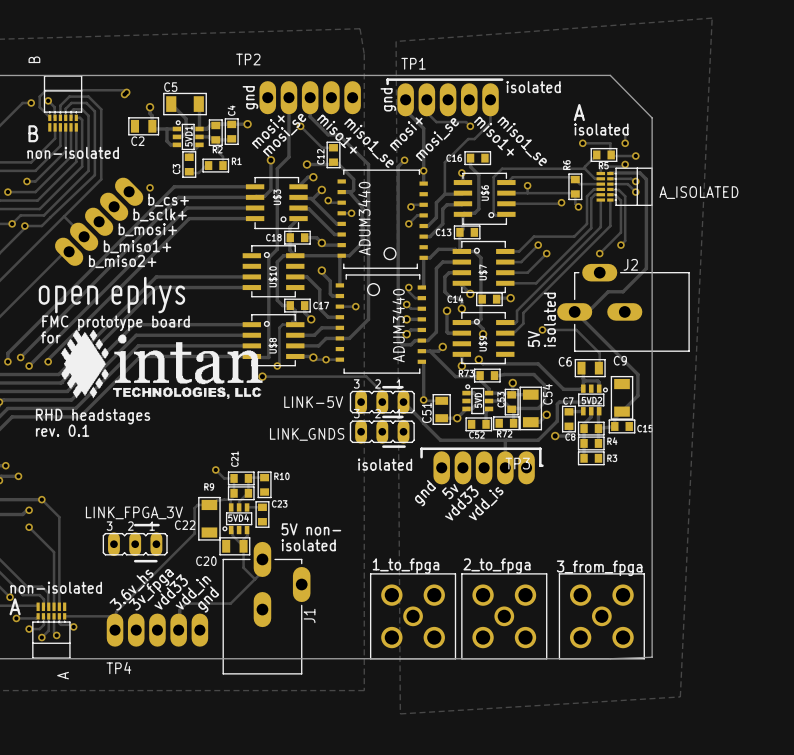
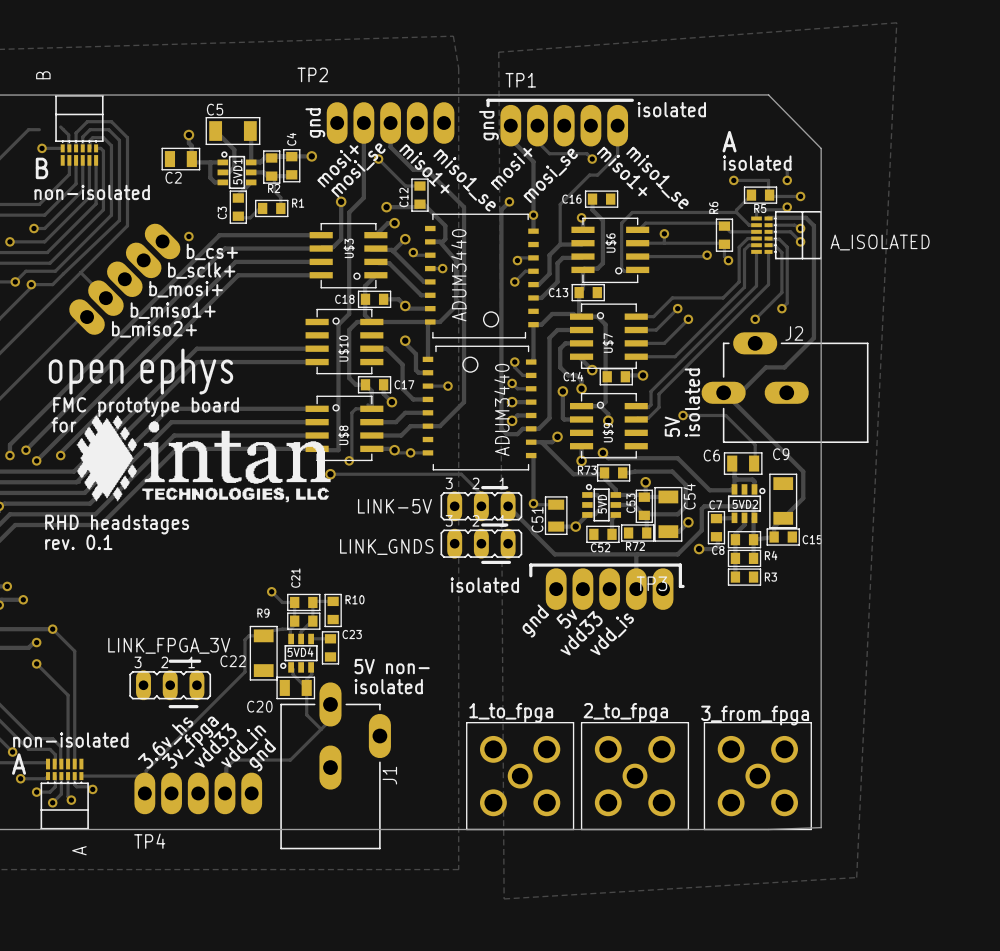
track: (126, 92) (124, 90) (46, 90) (39, 96) (39, 107) (49, 117) -> (42, 148) (62, 148)
via: (126, 92) -> none
via: (124, 94) -> none
via: (48, 100) -> none
via: (31, 102) -> none
via: none -> (42, 148)

